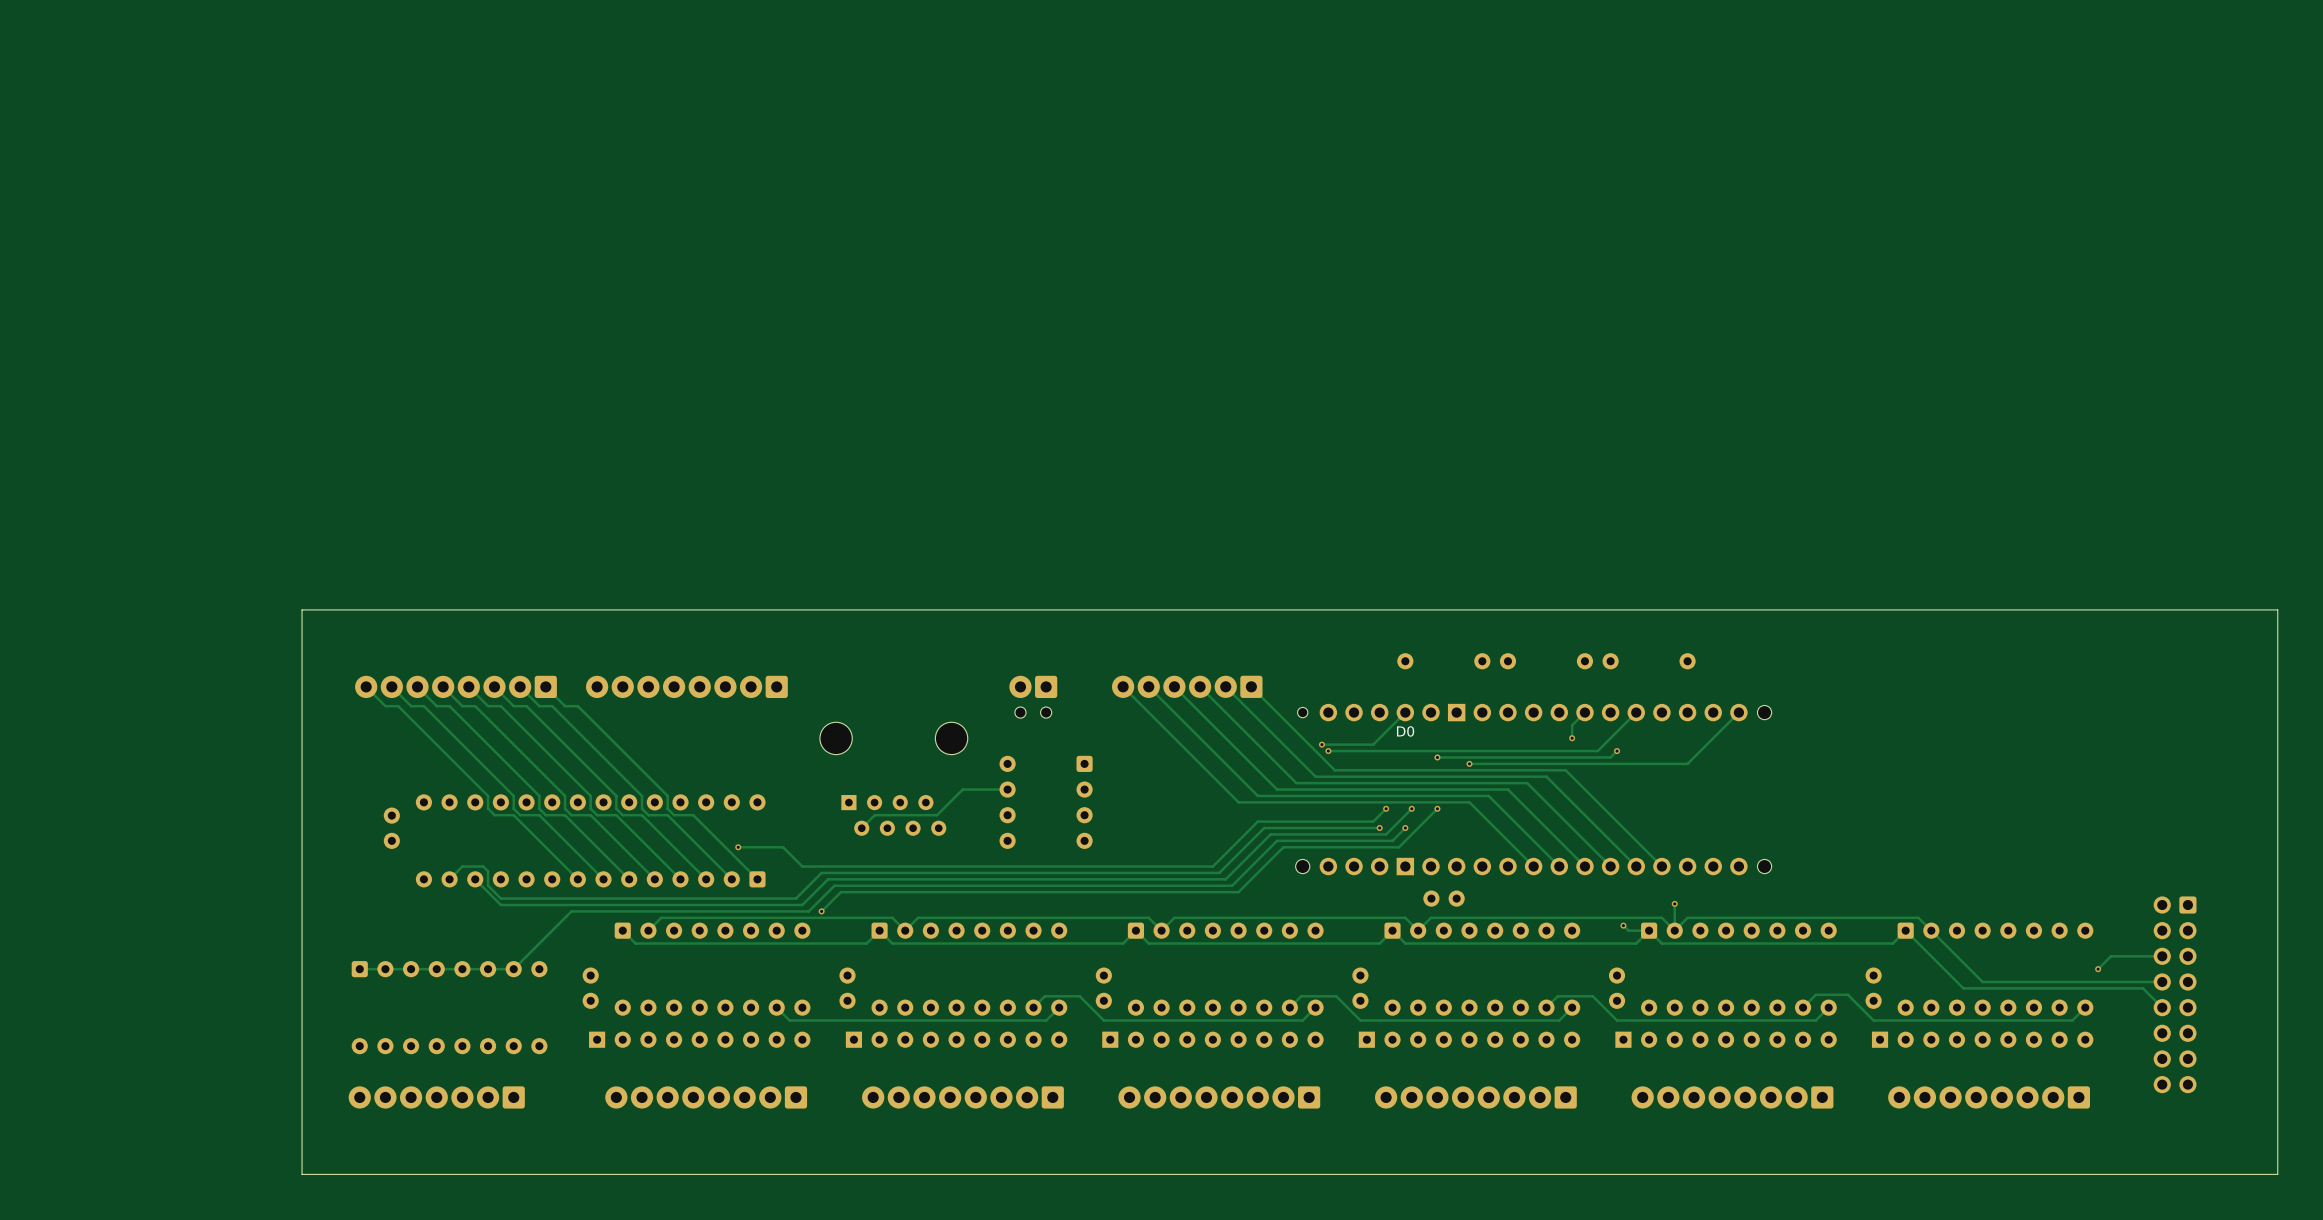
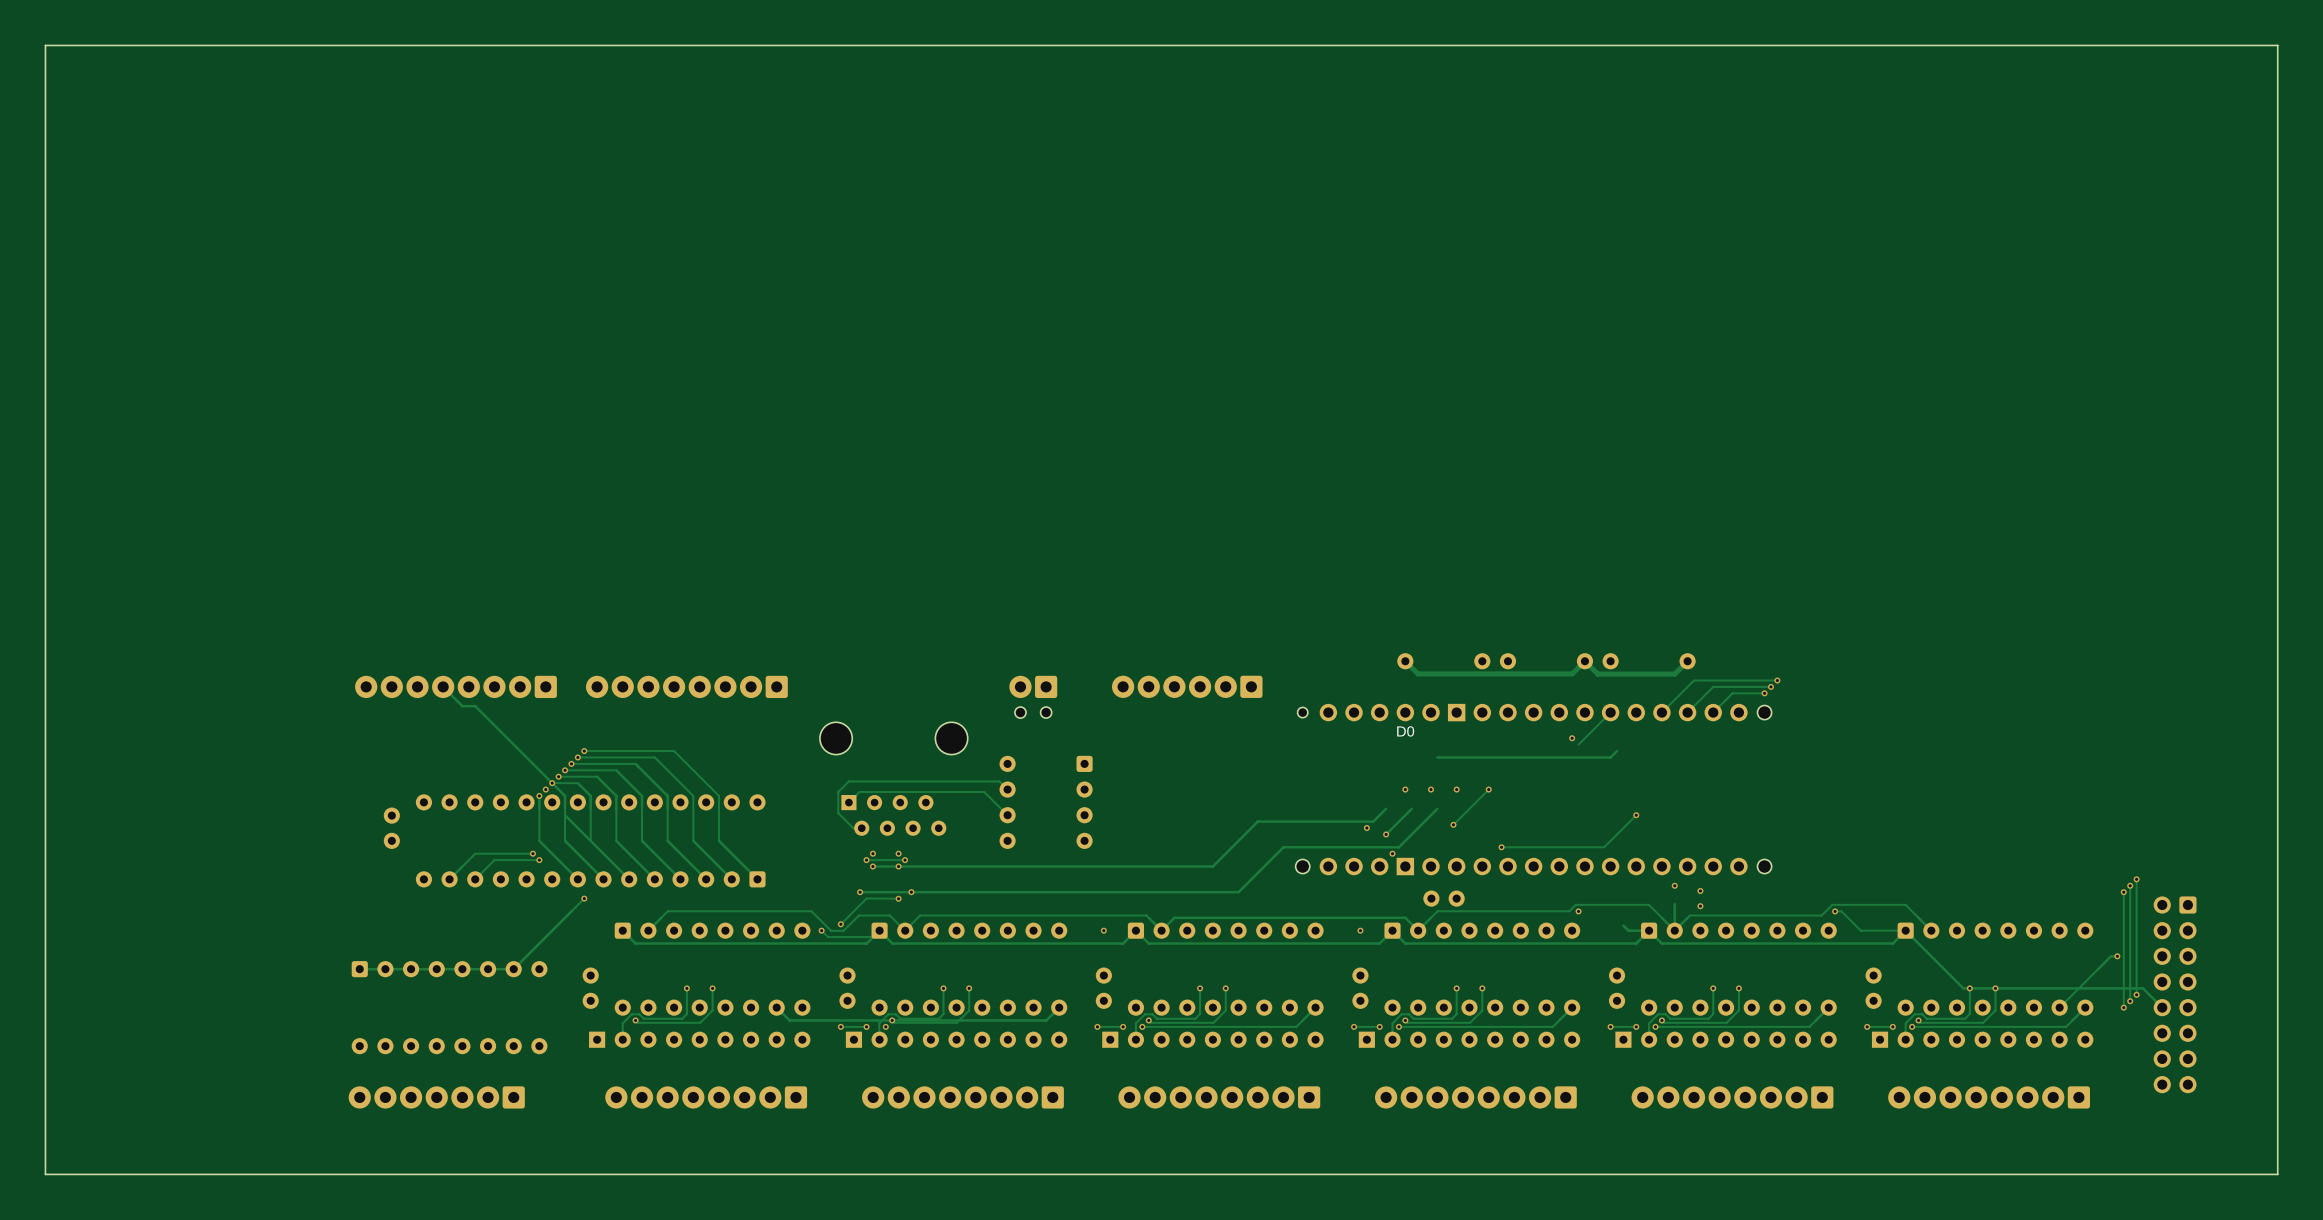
board edge: (2277, 609) (302, 609) (302, 1174) -> (2277, 609) (2277, 45) (45, 45) (45, 1174) (302, 1174)
track: none -> (1687, 661) (1674, 674) (1597, 674) (1584, 661) (1572, 673) (1417, 673) (1405, 661)
track: none -> (1777, 680) (1694, 680) (1661, 712)
via: none -> (1777, 680)
track: (366, 686) (385, 706) (398, 706) (488, 795) (488, 808) (494, 815) (513, 815) (539, 840) -> none
track: (391, 686) (411, 706) (423, 706) (513, 795) (513, 808) -> none
track: (417, 686) (436, 706) (449, 706) (539, 795) -> none
track: (468, 686) (488, 706) (500, 706) (577, 783) -> (552, 783) (577, 783)
track: (494, 686) (513, 706) (526, 706) (597, 776) -> (558, 776) (597, 776)
track: (520, 686) (539, 706) (552, 706) (616, 770) -> (565, 770) (616, 770)
track: (545, 686) (565, 706) (577, 706) (635, 763) -> (571, 763) (635, 763)
track: (1123, 686) (1238, 802) (1469, 802) (1533, 866) -> none
track: (1148, 686) (1257, 795) (1488, 795) (1559, 866) -> none
track: (1174, 686) (1277, 789) (1507, 789) (1584, 866) -> none
track: (1200, 686) (1296, 783) (1527, 783) (1610, 866) -> none
track: (1225, 686) (1315, 776) (1546, 776) (1636, 866) -> none
track: (1251, 686) (1334, 770) (1565, 770) (1661, 866) -> none
track: none -> (1770, 686) (1713, 686) (1687, 712)
via: none -> (1770, 686)
track: none -> (1764, 693) (1732, 693) (1713, 712)
via: none -> (1764, 693)
track: (1405, 712) (1373, 744) (1321, 744) -> none
track: (1584, 712) (1572, 725) (1572, 738) -> none
track: none -> (1610, 712) (1578, 744)
track: (1636, 712) (1597, 751) (1328, 751) -> none
track: (1738, 712) (1687, 763) (1469, 763) -> none
via: (1321, 744) -> none
via: none -> (584, 751)
via: (1328, 751) -> none
via: (1617, 751) -> none
via: none -> (577, 757)
via: (1437, 757) -> none
via: none -> (571, 763)
via: (1469, 763) -> none
via: none -> (565, 770)
via: none -> (558, 776)
via: none -> (552, 783)
via: none -> (545, 789)
track: (1007, 789) (962, 789) (937, 815) (874, 815) (861, 828) -> (1007, 789) (999, 781) (848, 781) (838, 791) (838, 813) (853, 828) (861, 828)
via: none -> (1405, 789)
via: none -> (1431, 789)
via: none -> (1456, 789)
track: none -> (1488, 789) (1453, 824)
via: none -> (1488, 789)
via: none -> (539, 795)
track: none -> (848, 802) (859, 791) (984, 791) (1007, 815)
track: (513, 808) (520, 815) (539, 815) (565, 840) -> (565, 808) (565, 840)
track: (539, 808) (545, 815) (565, 815) -> (539, 808) (539, 840)
track: (565, 808) (571, 815) (590, 815) (616, 840) -> (616, 808) (616, 840)
track: (590, 808) (597, 815) (616, 815) (642, 840) -> (642, 808) (642, 840)
track: none -> (590, 808) (590, 840)
track: (616, 808) (622, 815) (642, 815) (667, 840) -> (667, 808) (667, 840)
track: (642, 808) (648, 815) (667, 815) (693, 840) -> (577, 757) (654, 757) (693, 795) (693, 840)
track: (667, 808) (674, 815) (693, 815) (718, 840) -> (584, 751) (674, 751) (718, 795) (718, 840)
via: (1386, 808) -> none
via: (1411, 808) -> none
via: (1437, 808) -> none
track: none -> (1636, 815) (1604, 847) (1501, 847)
via: none -> (1636, 815)
via: none -> (1453, 824)
via: none -> (1366, 828)
track: (1379, 828) (1264, 828) (1219, 872) (821, 872) (795, 898) (500, 898) (488, 885) (488, 871) (483, 866) (462, 866) -> (532, 853) (475, 853) (462, 866)
via: (1379, 828) -> none
track: (1405, 828) (1392, 840) (1277, 840) (1232, 885) (834, 885) (808, 911) (571, 911) -> (584, 898) (571, 911)
via: (1405, 828) -> none
track: (1386, 834) (1270, 834) (1225, 879) (828, 879) (802, 905) (500, 905) (475, 879) -> (539, 860) (494, 860) (475, 879)
via: none -> (1386, 834)
track: (738, 847) (783, 847) (802, 866) (872, 866) -> none
via: (738, 847) -> none
via: none -> (1501, 847)
via: none -> (532, 853)
via: none -> (872, 853)
via: none -> (898, 853)
via: none -> (1392, 853)
via: none -> (539, 860)
via: none -> (866, 860)
track: none -> (905, 860) (866, 860)
via: none -> (905, 860)
via: none -> (872, 866)
via: none -> (898, 866)
track: none -> (2136, 879) (2136, 994)
via: none -> (2136, 879)
via: none -> (1674, 885)
track: none -> (2130, 885) (2130, 1001)
via: none -> (2130, 885)
via: none -> (1700, 891)
track: (860, 892) (840, 892) (821, 911) -> none
via: none -> (860, 892)
via: none -> (911, 892)
track: none -> (2123, 892) (2123, 1007)
via: none -> (2123, 892)
via: none -> (584, 898)
track: none -> (898, 898) (866, 898) (840, 924)
via: none -> (898, 898)
via: (1674, 903) -> none
via: none -> (1700, 906)
via: (821, 911) -> none
via: none -> (1578, 911)
track: none -> (1835, 911) (1841, 911) (1860, 930) (1905, 930)
via: none -> (1835, 911)
track: (1148, 917) (918, 917) (905, 930) (892, 917) (661, 917) -> (1148, 917) (1146, 915) (920, 915) (905, 930) (889, 915) (858, 915) (843, 930) (831, 930) (811, 911) (667, 911) (661, 917)
track: (1661, 917) (1431, 917) -> (1661, 917) (1648, 904) (1575, 904) (1569, 911) (1437, 911) (1431, 917)
track: (1918, 917) (1687, 917) -> (1918, 917) (1905, 904) (1832, 904) (1821, 915) (1689, 915) (1687, 917)
via: none -> (840, 924)
via: (1623, 925) -> none
track: none -> (821, 930) (828, 937) (872, 937)
via: none -> (821, 930)
via: none -> (1103, 930)
via: none -> (1360, 930)
track: (1931, 930) (1982, 981) (2162, 981) -> none
via: none -> (2117, 956)
track: (2162, 956) (2117, 956) -> none
track: none -> (2098, 969) (2059, 1007)
via: (2098, 969) -> none
track: none -> (686, 988) (686, 1014) (682, 1018) (643, 1018) (639, 1014) (631, 1014) (622, 1023) (622, 1039)
via: none -> (686, 988)
track: none -> (712, 988) (712, 1010) (700, 1022) (637, 1022) (635, 1020)
via: none -> (712, 988)
track: none -> (943, 988) (943, 1014) (938, 1018) (900, 1018) (895, 1014) (888, 1014) (879, 1023) (879, 1039)
via: none -> (943, 988)
track: none -> (969, 988) (969, 1010) (956, 1022) (894, 1022) (892, 1020)
via: none -> (969, 988)
track: none -> (1200, 988) (1200, 1014) (1195, 1018) (1156, 1018) (1152, 1014) (1144, 1014) (1135, 1023) (1135, 1039)
via: none -> (1200, 988)
track: none -> (1225, 988) (1225, 1010) (1213, 1022) (1151, 1022) (1148, 1020)
via: none -> (1225, 988)
track: none -> (1456, 988) (1456, 1014) (1451, 1018) (1413, 1018) (1409, 1014) (1401, 1014) (1392, 1023) (1392, 1039)
via: none -> (1456, 988)
track: none -> (1482, 988) (1482, 1010) (1470, 1022) (1407, 1022) (1405, 1020)
via: none -> (1482, 988)
track: none -> (1713, 988) (1713, 1014) (1708, 1018) (1670, 1018) (1665, 1014) (1658, 1014) (1649, 1023) (1649, 1039)
via: none -> (1713, 988)
track: none -> (1738, 988) (1738, 1010) (1726, 1022) (1664, 1022) (1661, 1020)
via: none -> (1738, 988)
track: none -> (1969, 988) (1969, 1014) (1965, 1018) (1926, 1018) (1922, 1014) (1914, 1014) (1905, 1023) (1905, 1039)
via: none -> (1969, 988)
track: none -> (1995, 988) (1995, 1010) (1983, 1022) (1920, 1022) (1918, 1020)
via: none -> (1995, 988)
via: none -> (2136, 994)
via: none -> (2130, 1001)
track: (1033, 1007) (1044, 996) (1079, 996) (1103, 1020) (1302, 1020) -> (1142, 1026) (1296, 1026) (1302, 1020)
track: (1289, 1007) (1301, 996) (1336, 996) (1360, 1020) (1559, 1020) -> (1398, 1026) (1552, 1026) (1559, 1020)
track: (1546, 1007) (1557, 996) (1592, 996) (1617, 1020) (1815, 1020) -> (1655, 1026) (1809, 1026) (1815, 1020)
track: (1803, 1007) (1815, 994) (1847, 994) (1873, 1020) (2072, 1020) -> (1912, 1026) (2066, 1026) (2072, 1020)
via: none -> (2123, 1007)
via: none -> (635, 1020)
via: none -> (892, 1020)
via: none -> (1148, 1020)
via: none -> (1405, 1020)
via: none -> (1661, 1020)
via: none -> (1918, 1020)
via: none -> (840, 1026)
track: none -> (866, 1026) (840, 1026)
via: none -> (866, 1026)
via: none -> (885, 1026)
via: none -> (1097, 1026)
track: none -> (1123, 1026) (1097, 1026)
via: none -> (1123, 1026)
via: none -> (1142, 1026)
via: none -> (1354, 1026)
track: none -> (1379, 1026) (1354, 1026)
via: none -> (1379, 1026)
via: none -> (1398, 1026)
via: none -> (1610, 1026)
track: none -> (1636, 1026) (1610, 1026)
via: none -> (1636, 1026)
via: none -> (1655, 1026)
via: none -> (1867, 1026)
track: none -> (1892, 1026) (1867, 1026)
via: none -> (1892, 1026)
via: none -> (1912, 1026)

